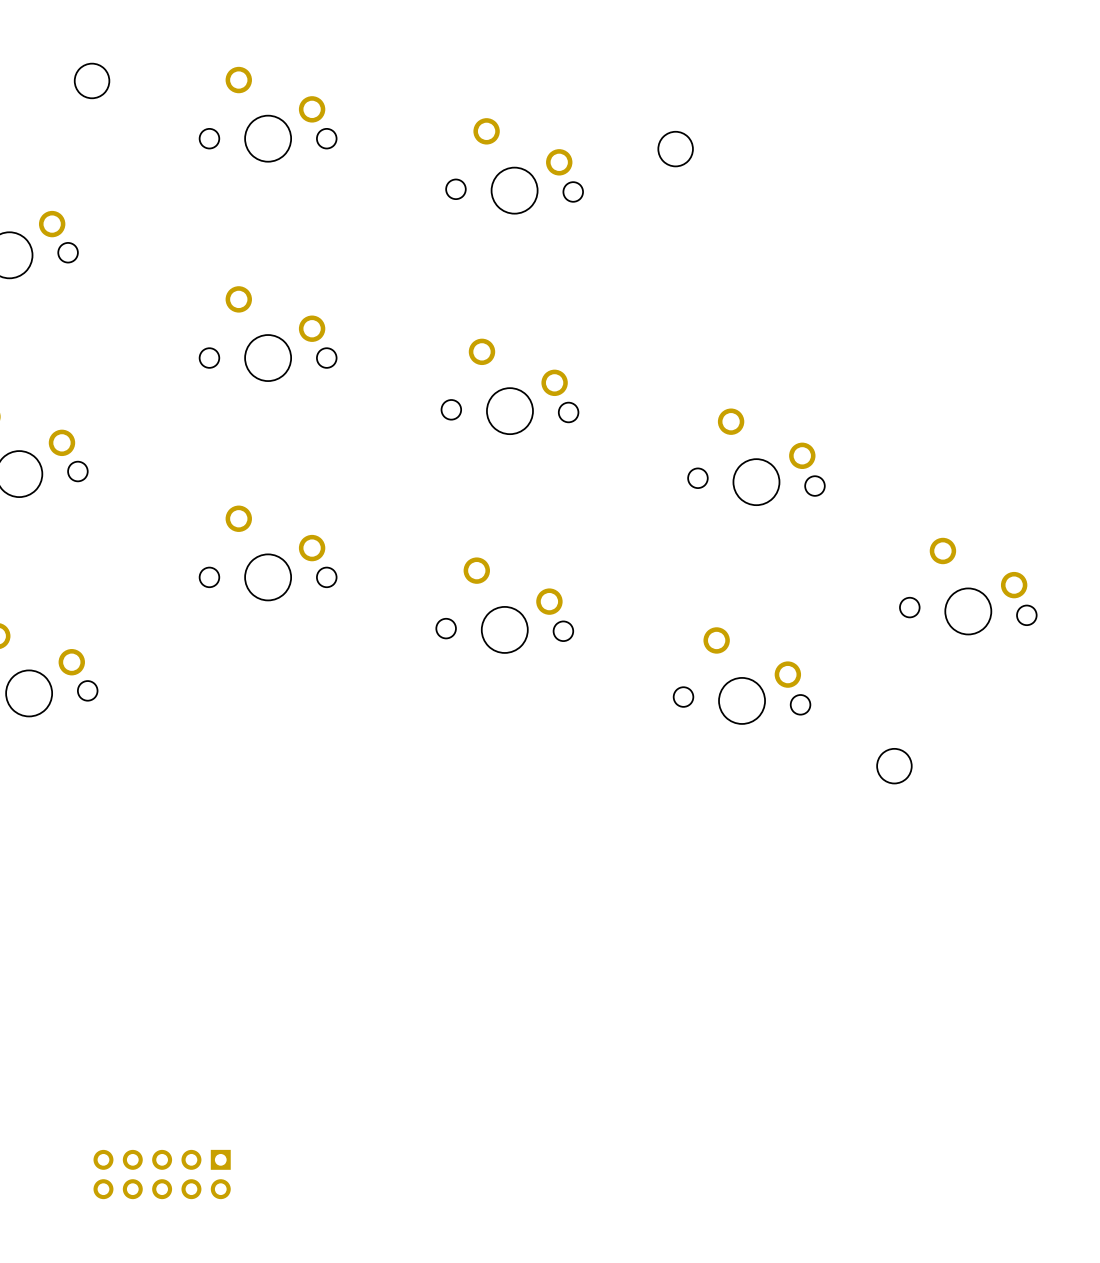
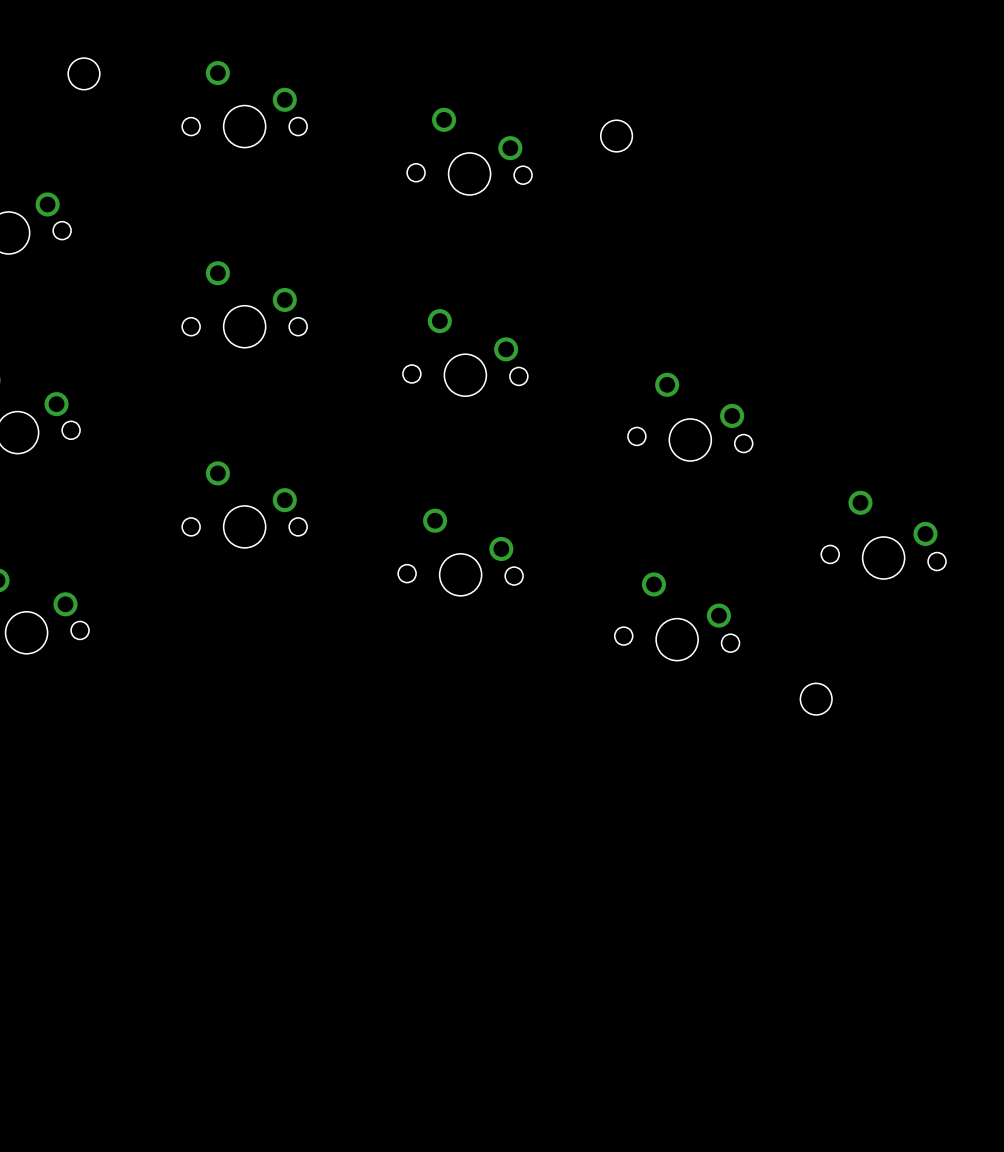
part: (162, 1174) -> none

